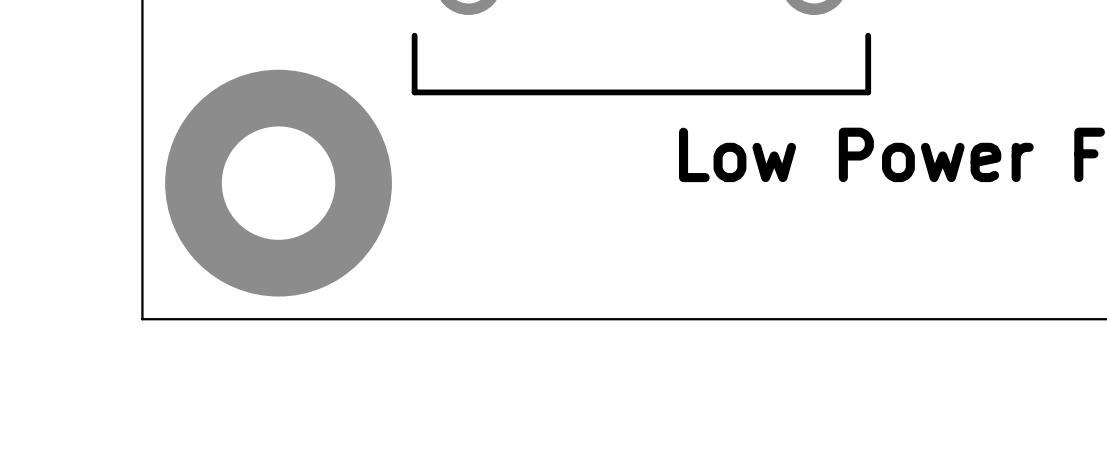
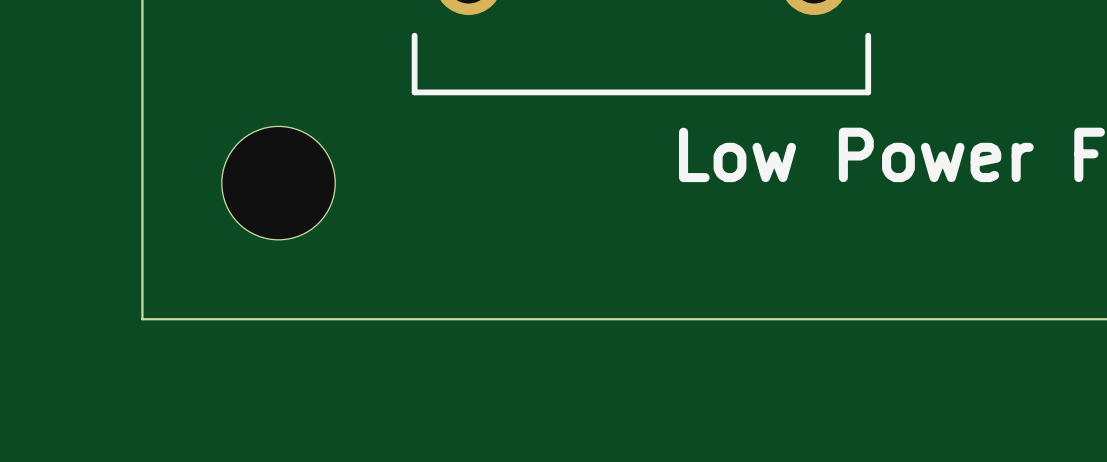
part footprint: [165, 69, 392, 297] -> [221, 126, 336, 240]

